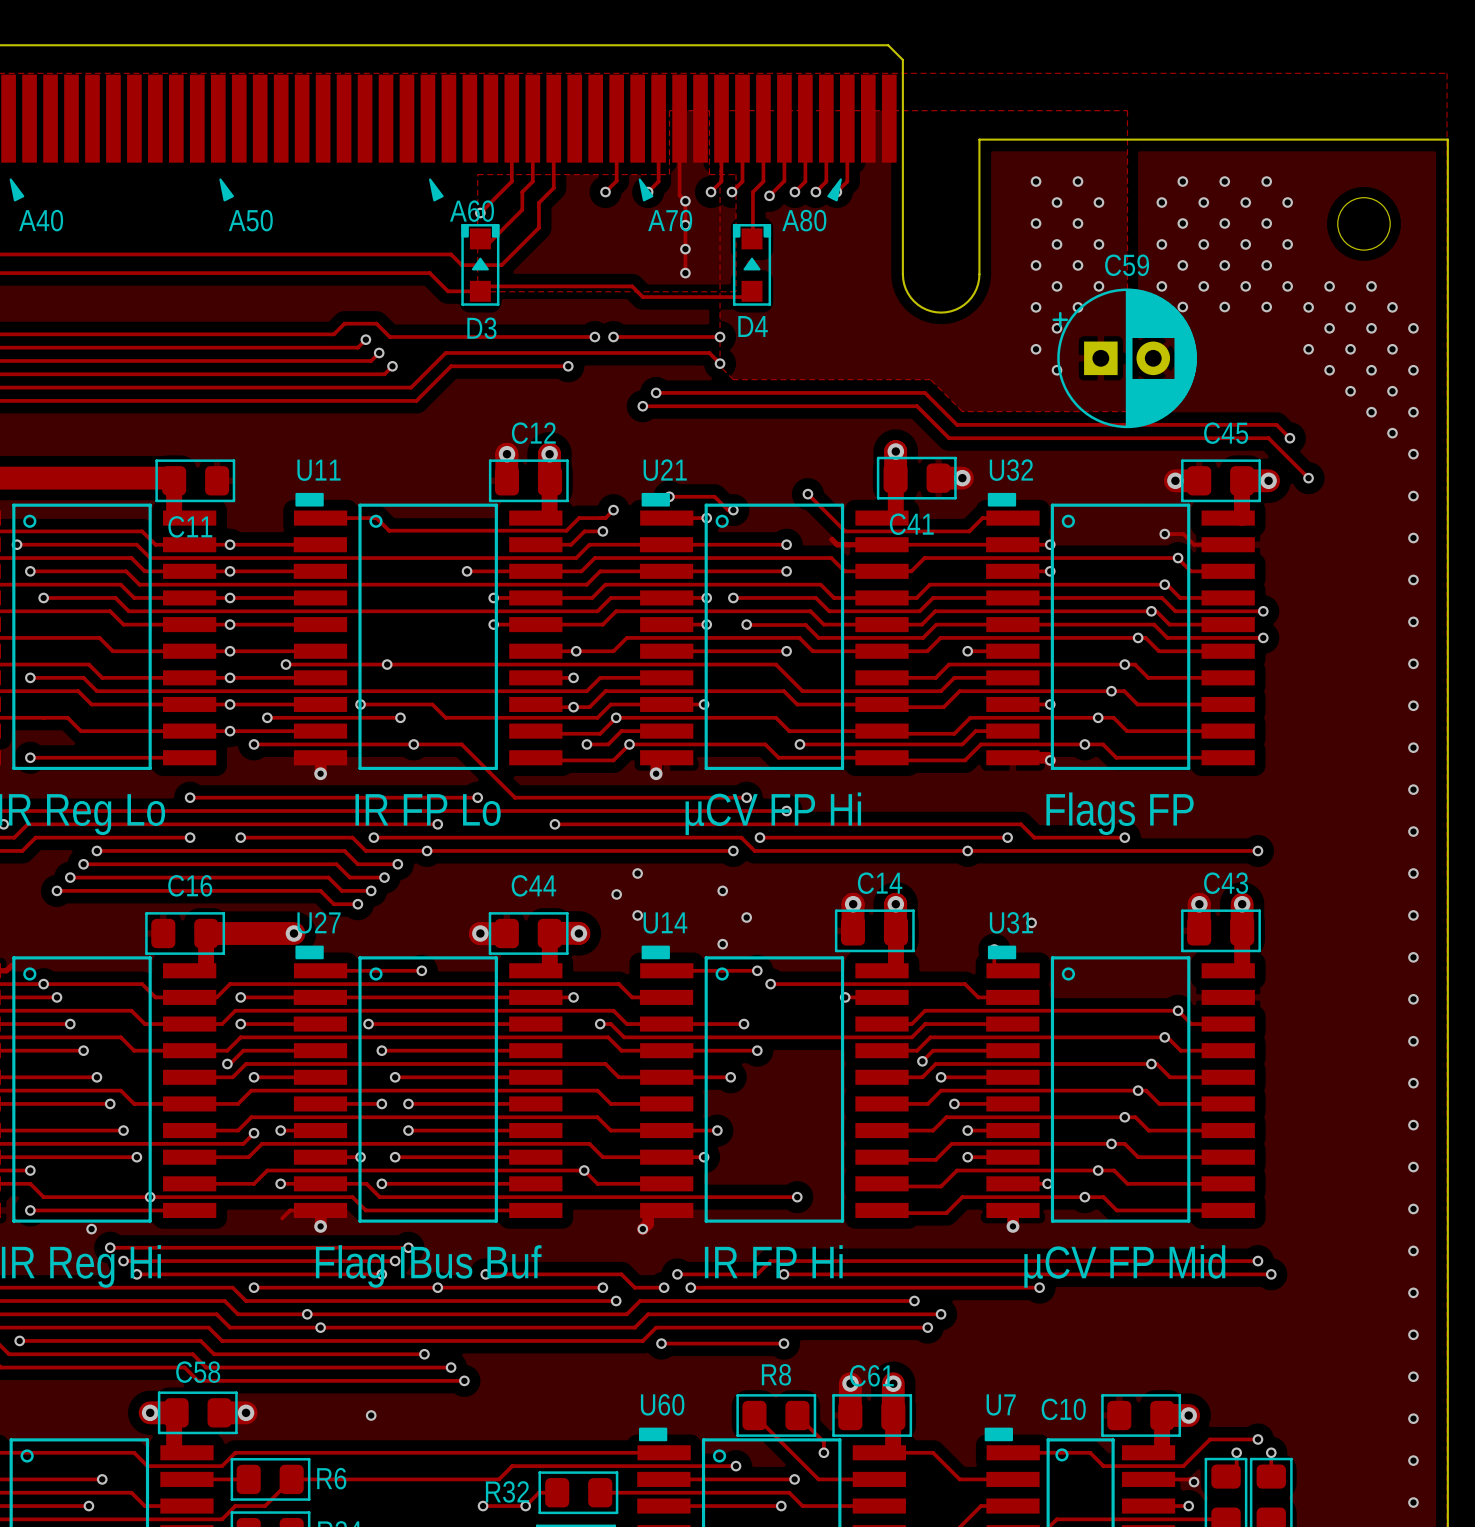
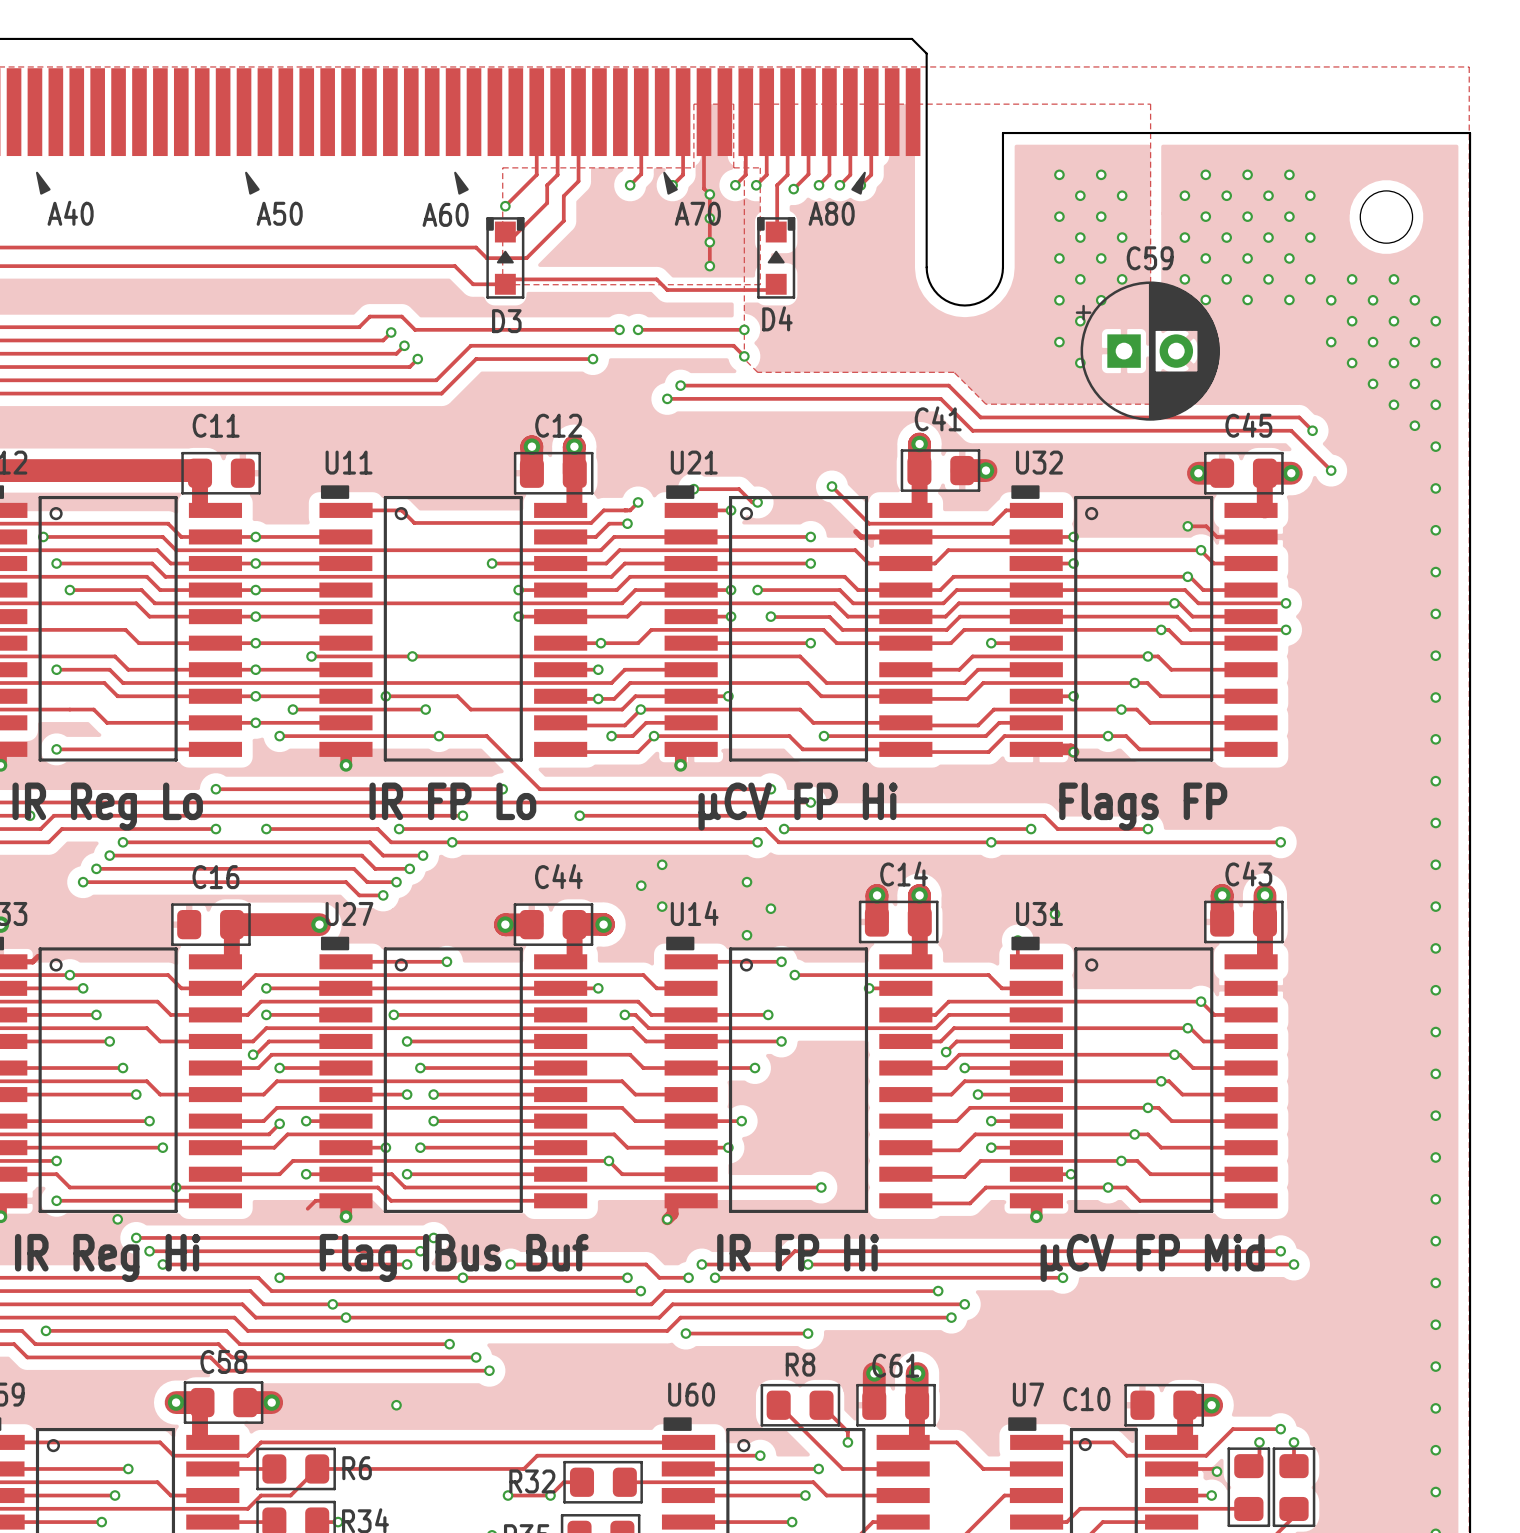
part text position: A60 (472, 211) -> A60 (445, 214)
C41 name position: C41 (911, 524) -> C41 (938, 418)
C11 name position: C11 (190, 526) -> C11 (216, 425)

